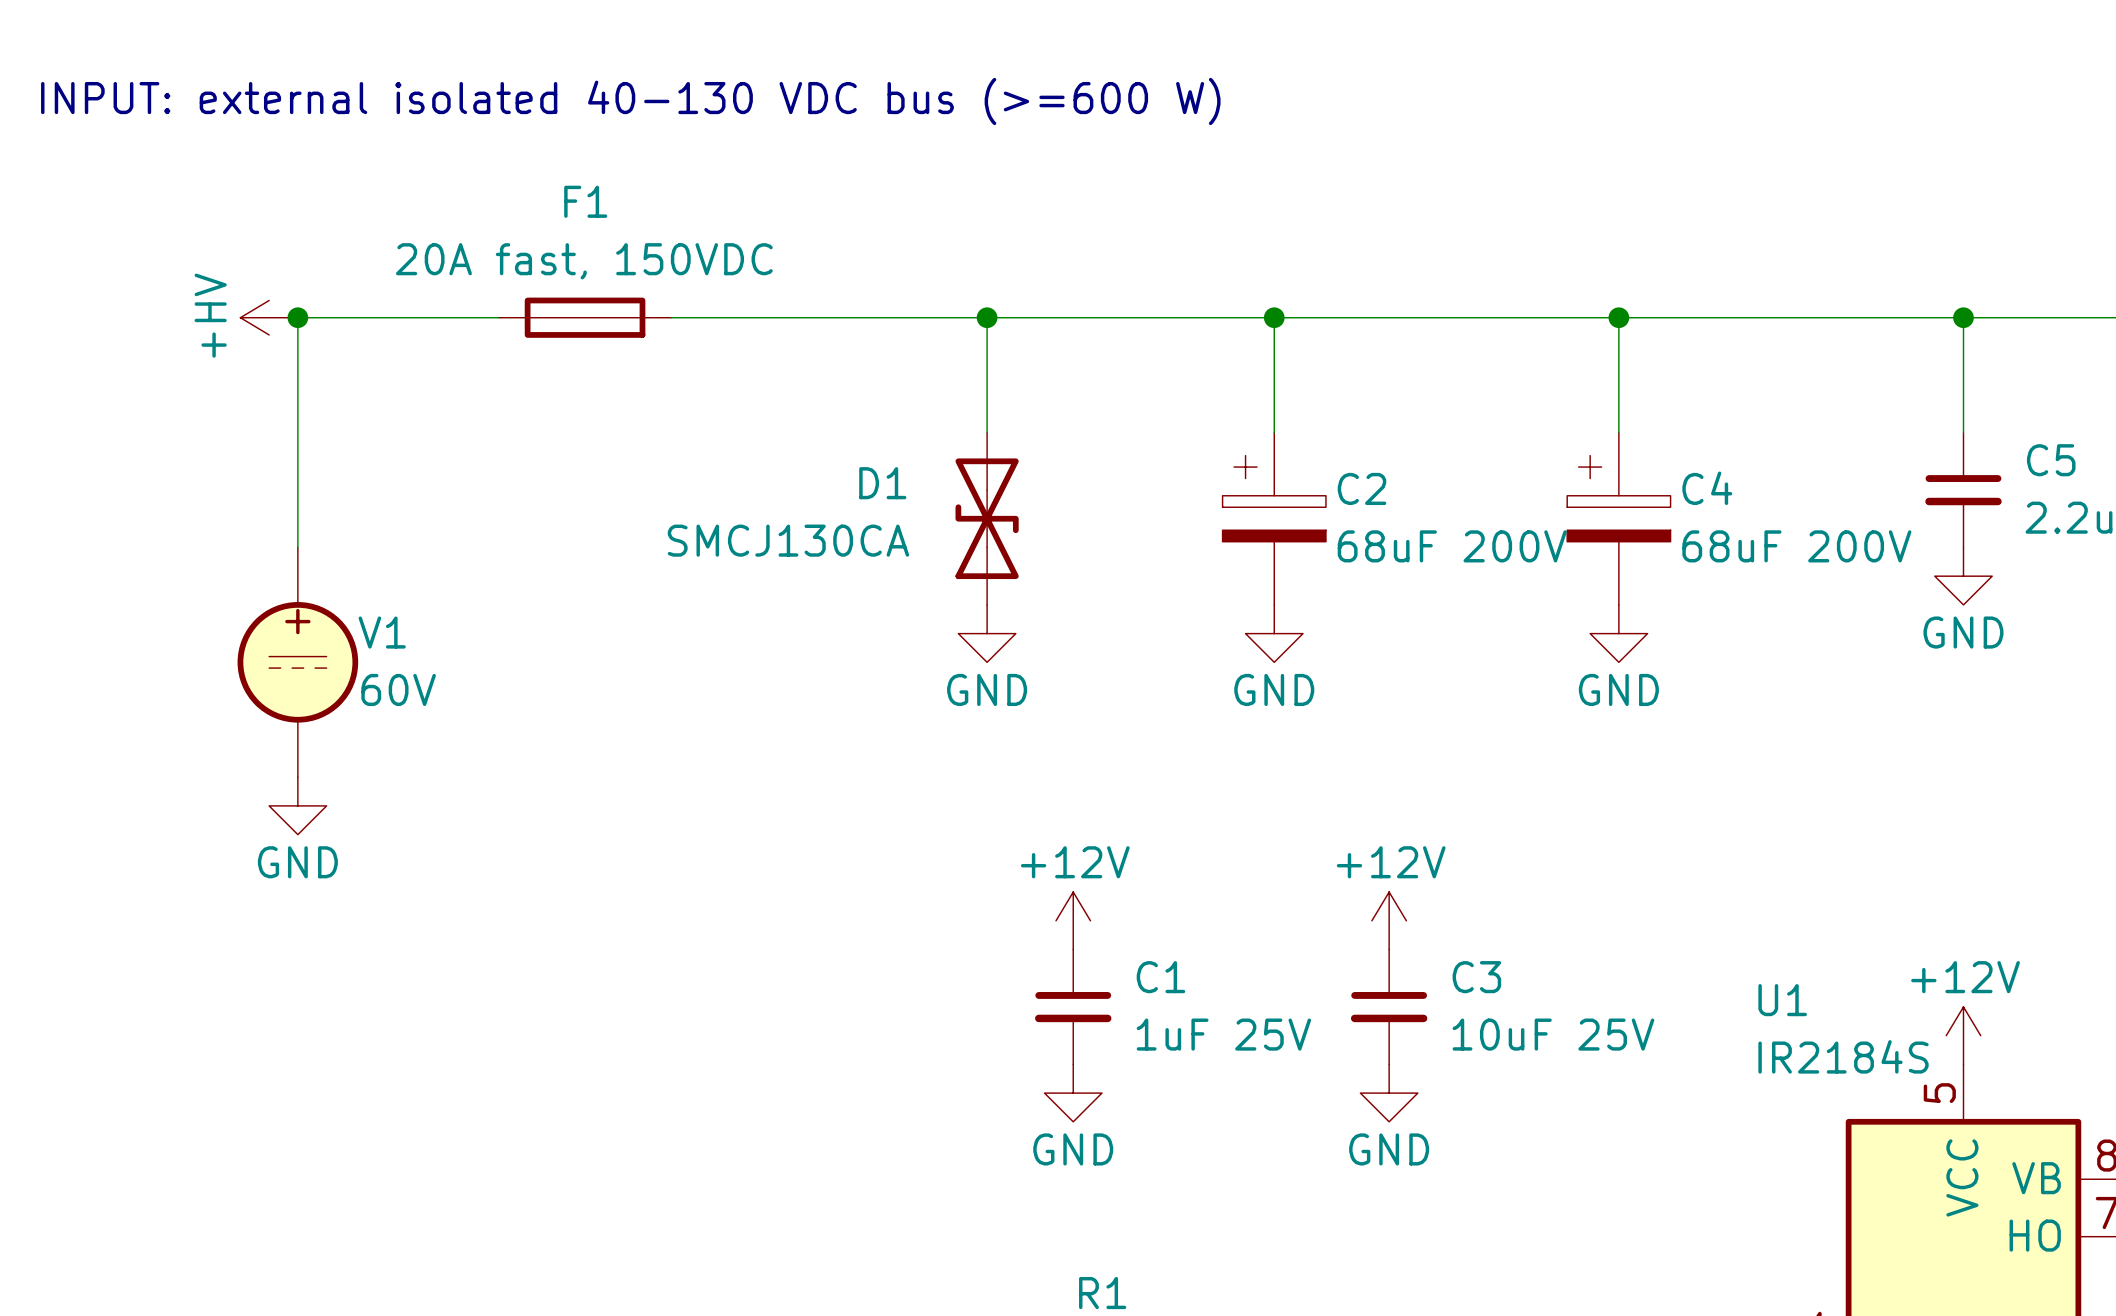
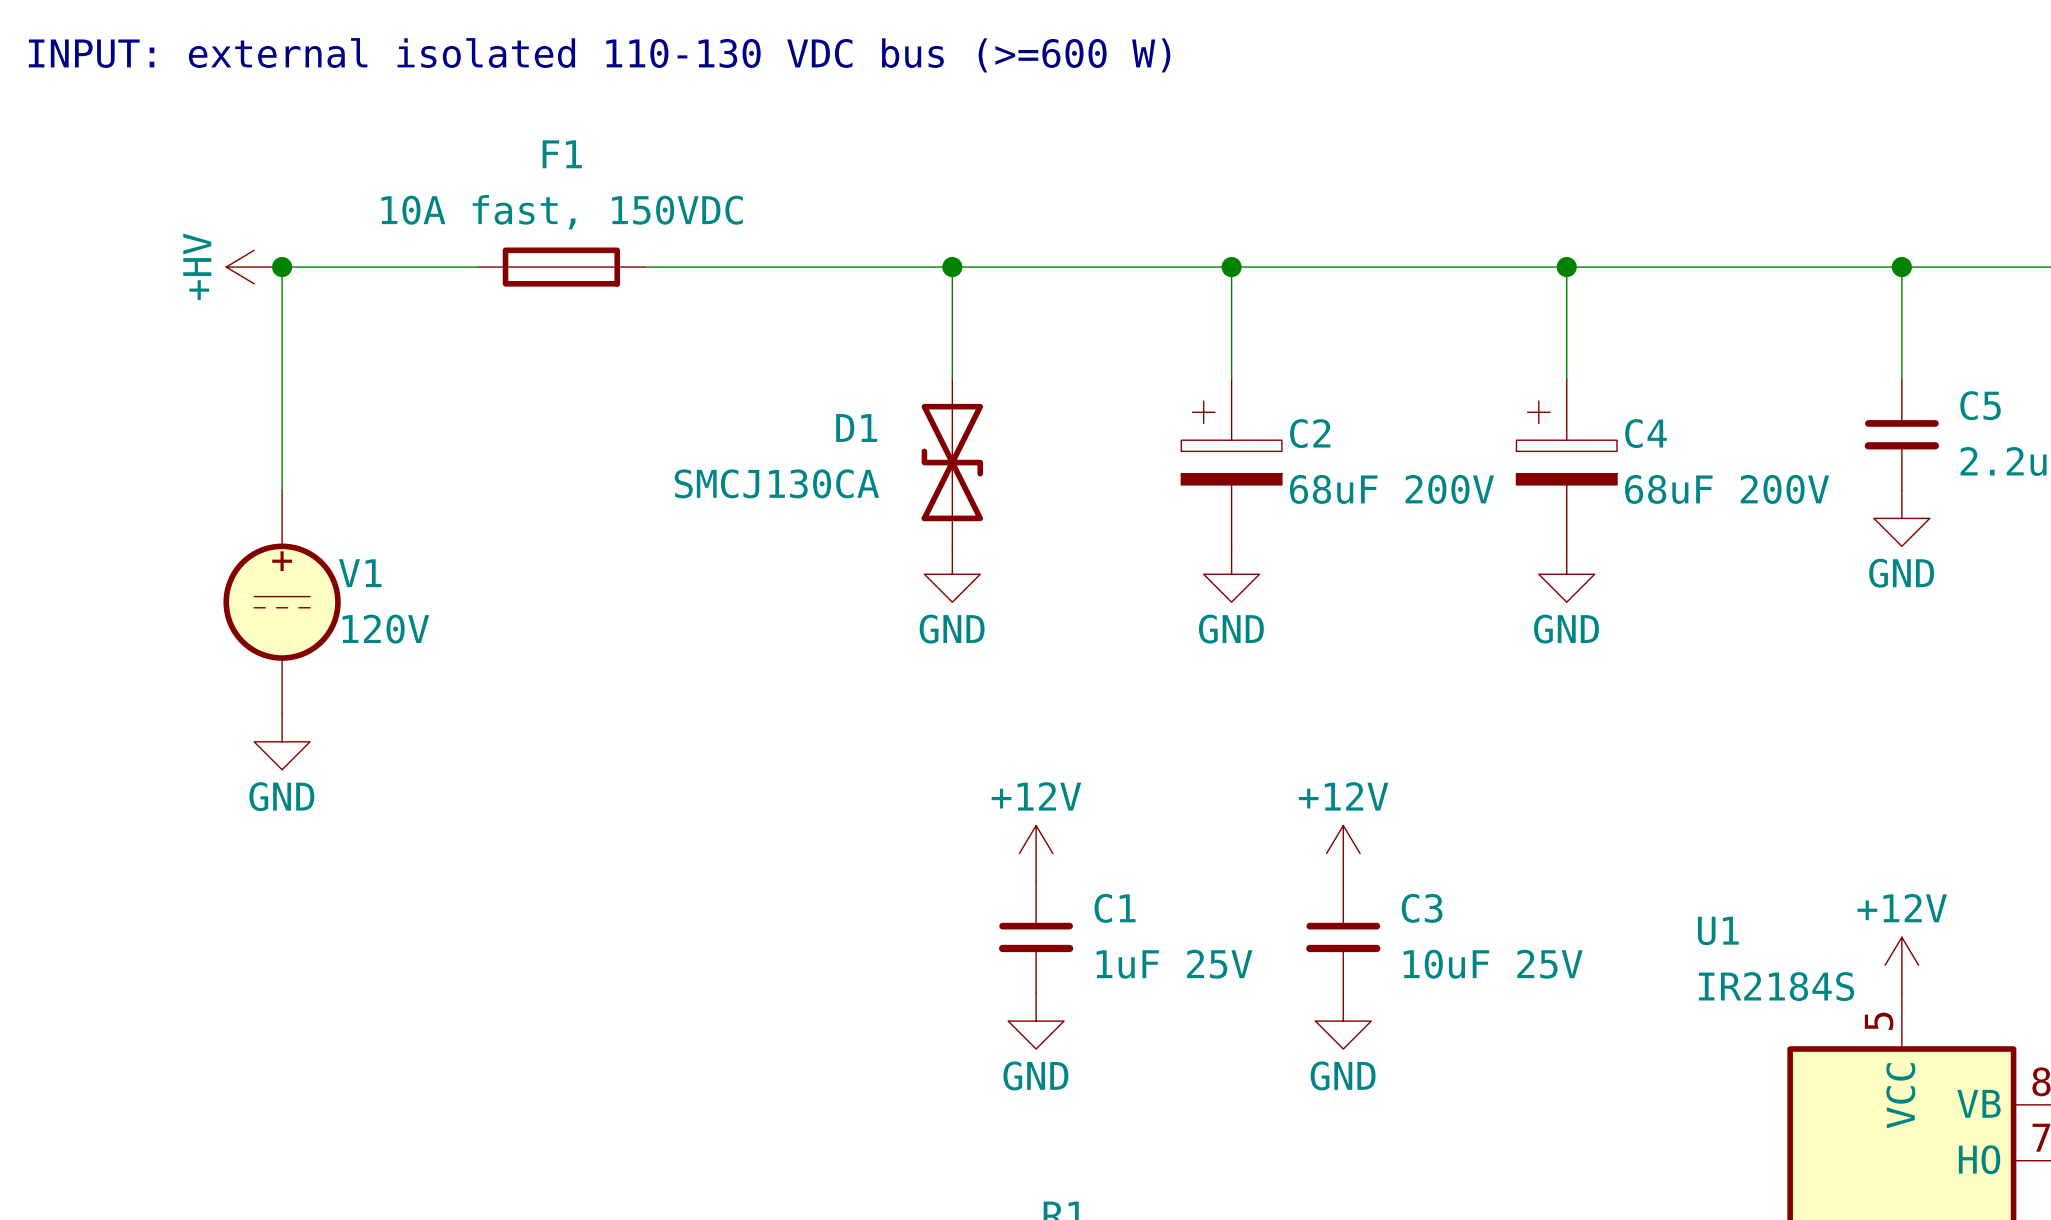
text: INPUT: external isolated 40-130 VDC bus (>=600 W) (630, 101) -> INPUT: external isolated 110-130 VDC bus (>=600 W) (599, 55)
F1 value: 20A fast, 150VDC (584, 261) -> 10A fast, 150VDC (562, 212)
V1 value: 60V (398, 689) -> 120V (385, 629)

